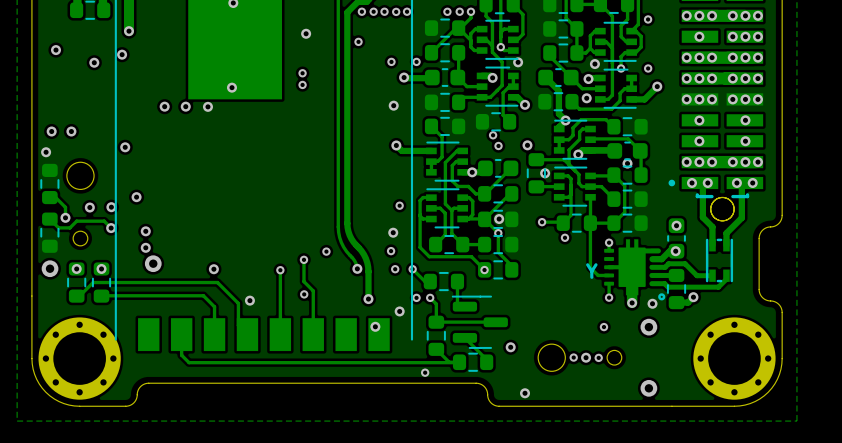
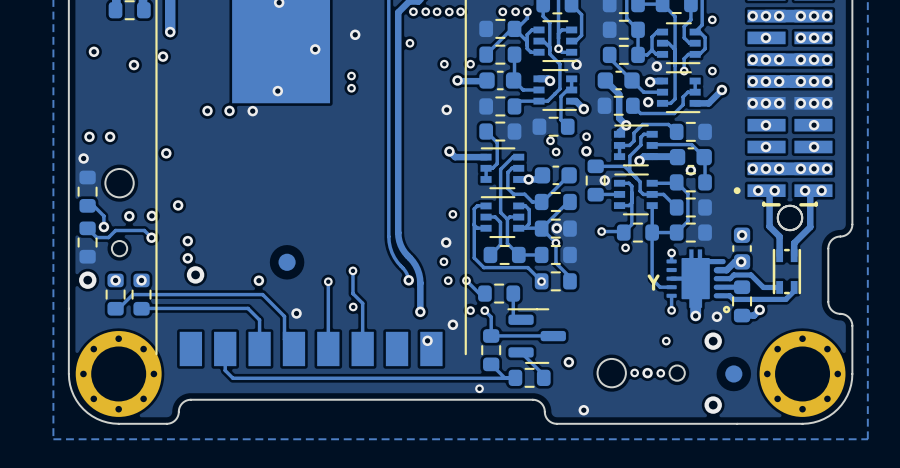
via: none -> (315, 49)
via: none -> (586, 136)
part: none -> (287, 262)
via: (326, 251) -> none
part: none -> (733, 373)

